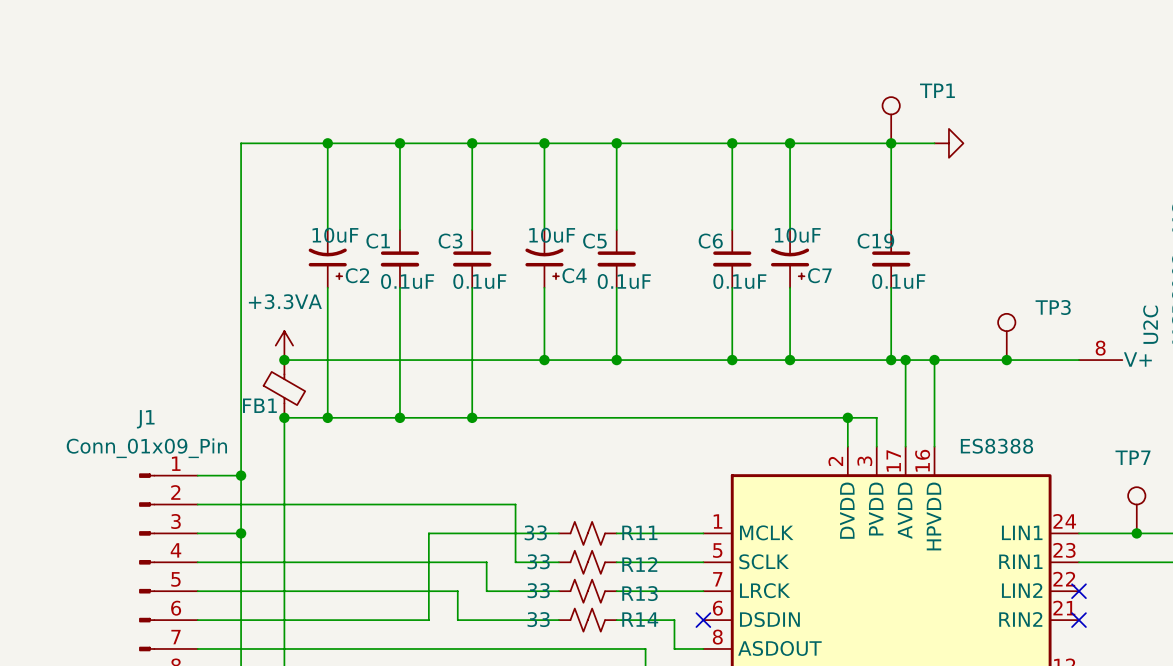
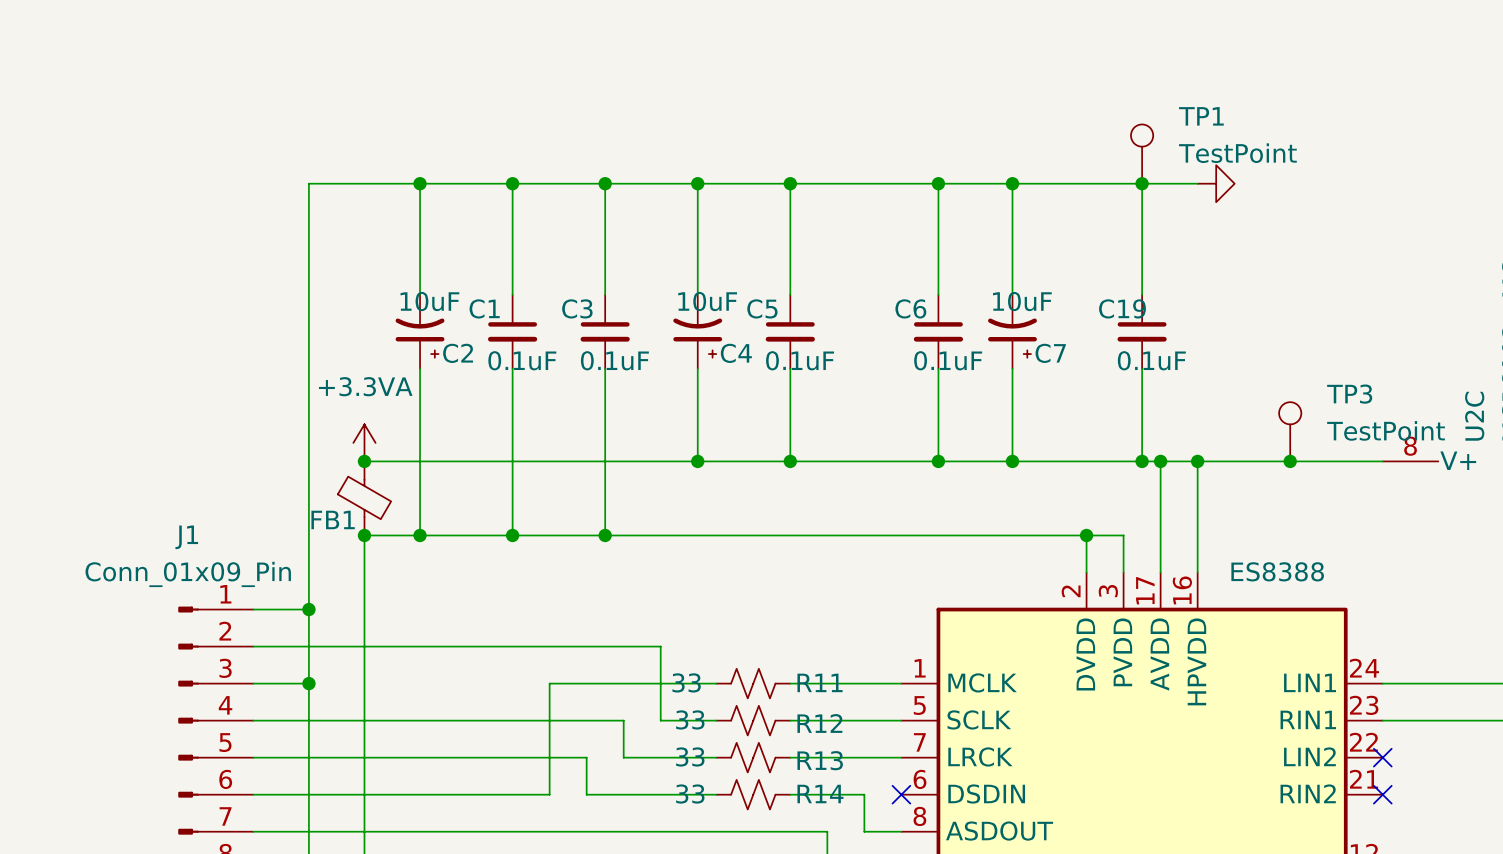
TP1 value: none -> TestPoint (1237, 153)
TP3 value: none -> TestPoint (1386, 430)
TP7: (1136, 510) -> none
junction: (1136, 533) -> none

